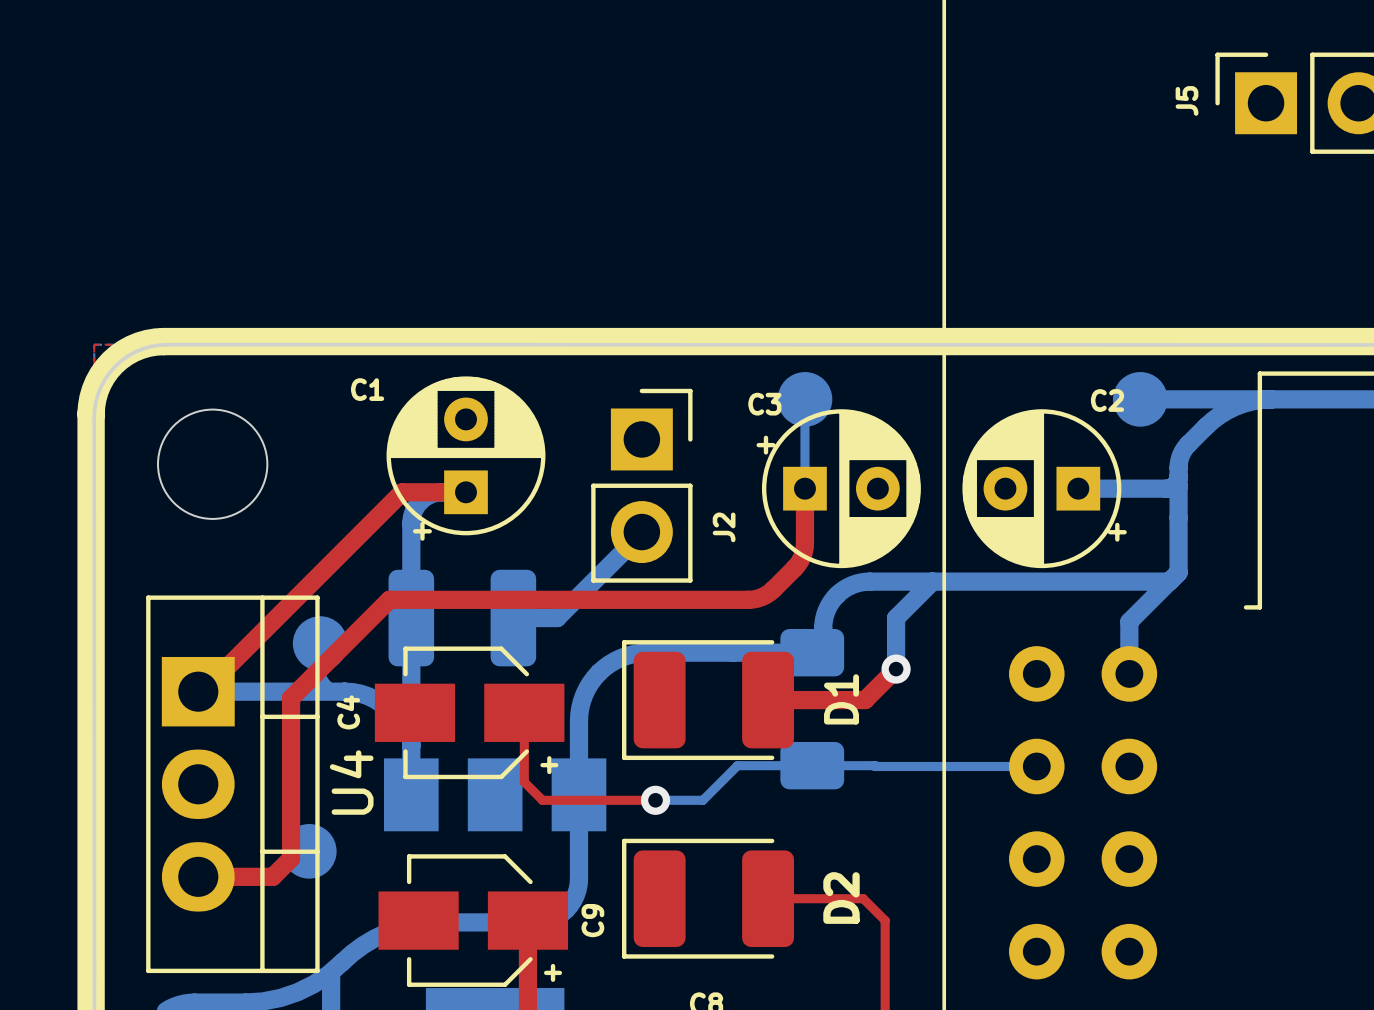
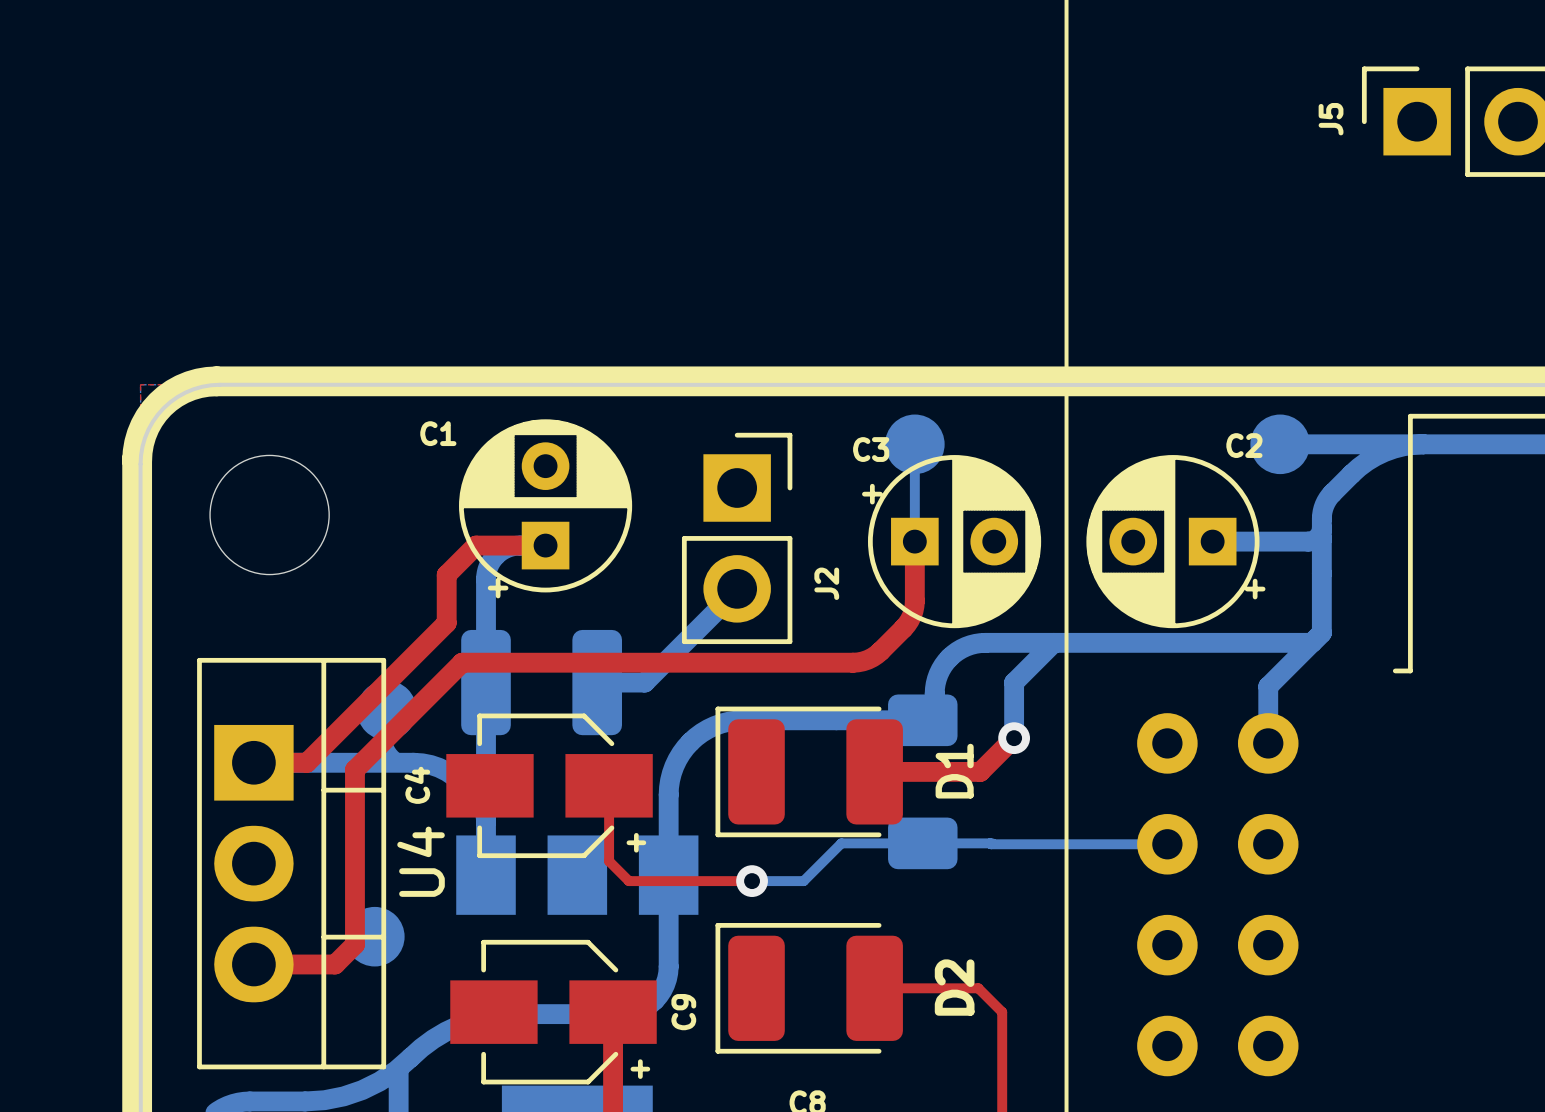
top track: (375, 519) (202, 691) -> (446, 574) (446, 623) (306, 762) (258, 762)

